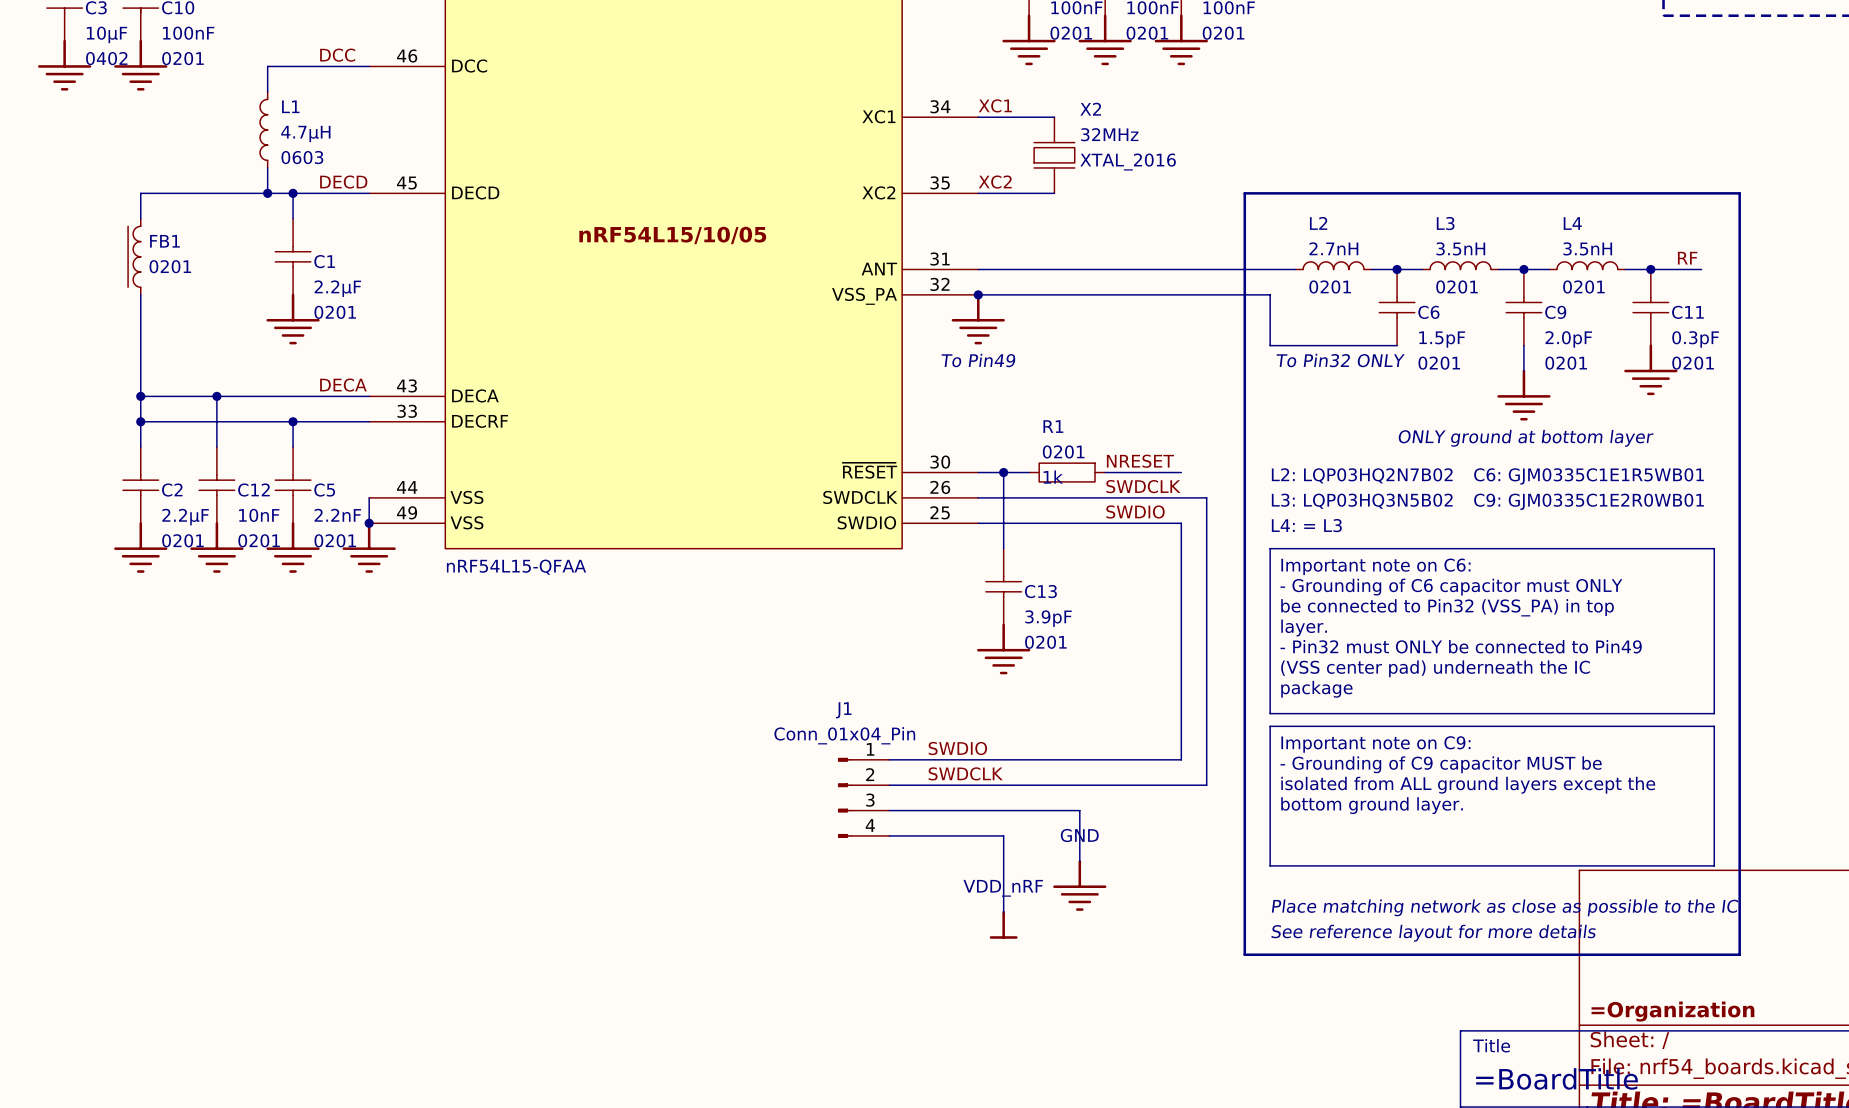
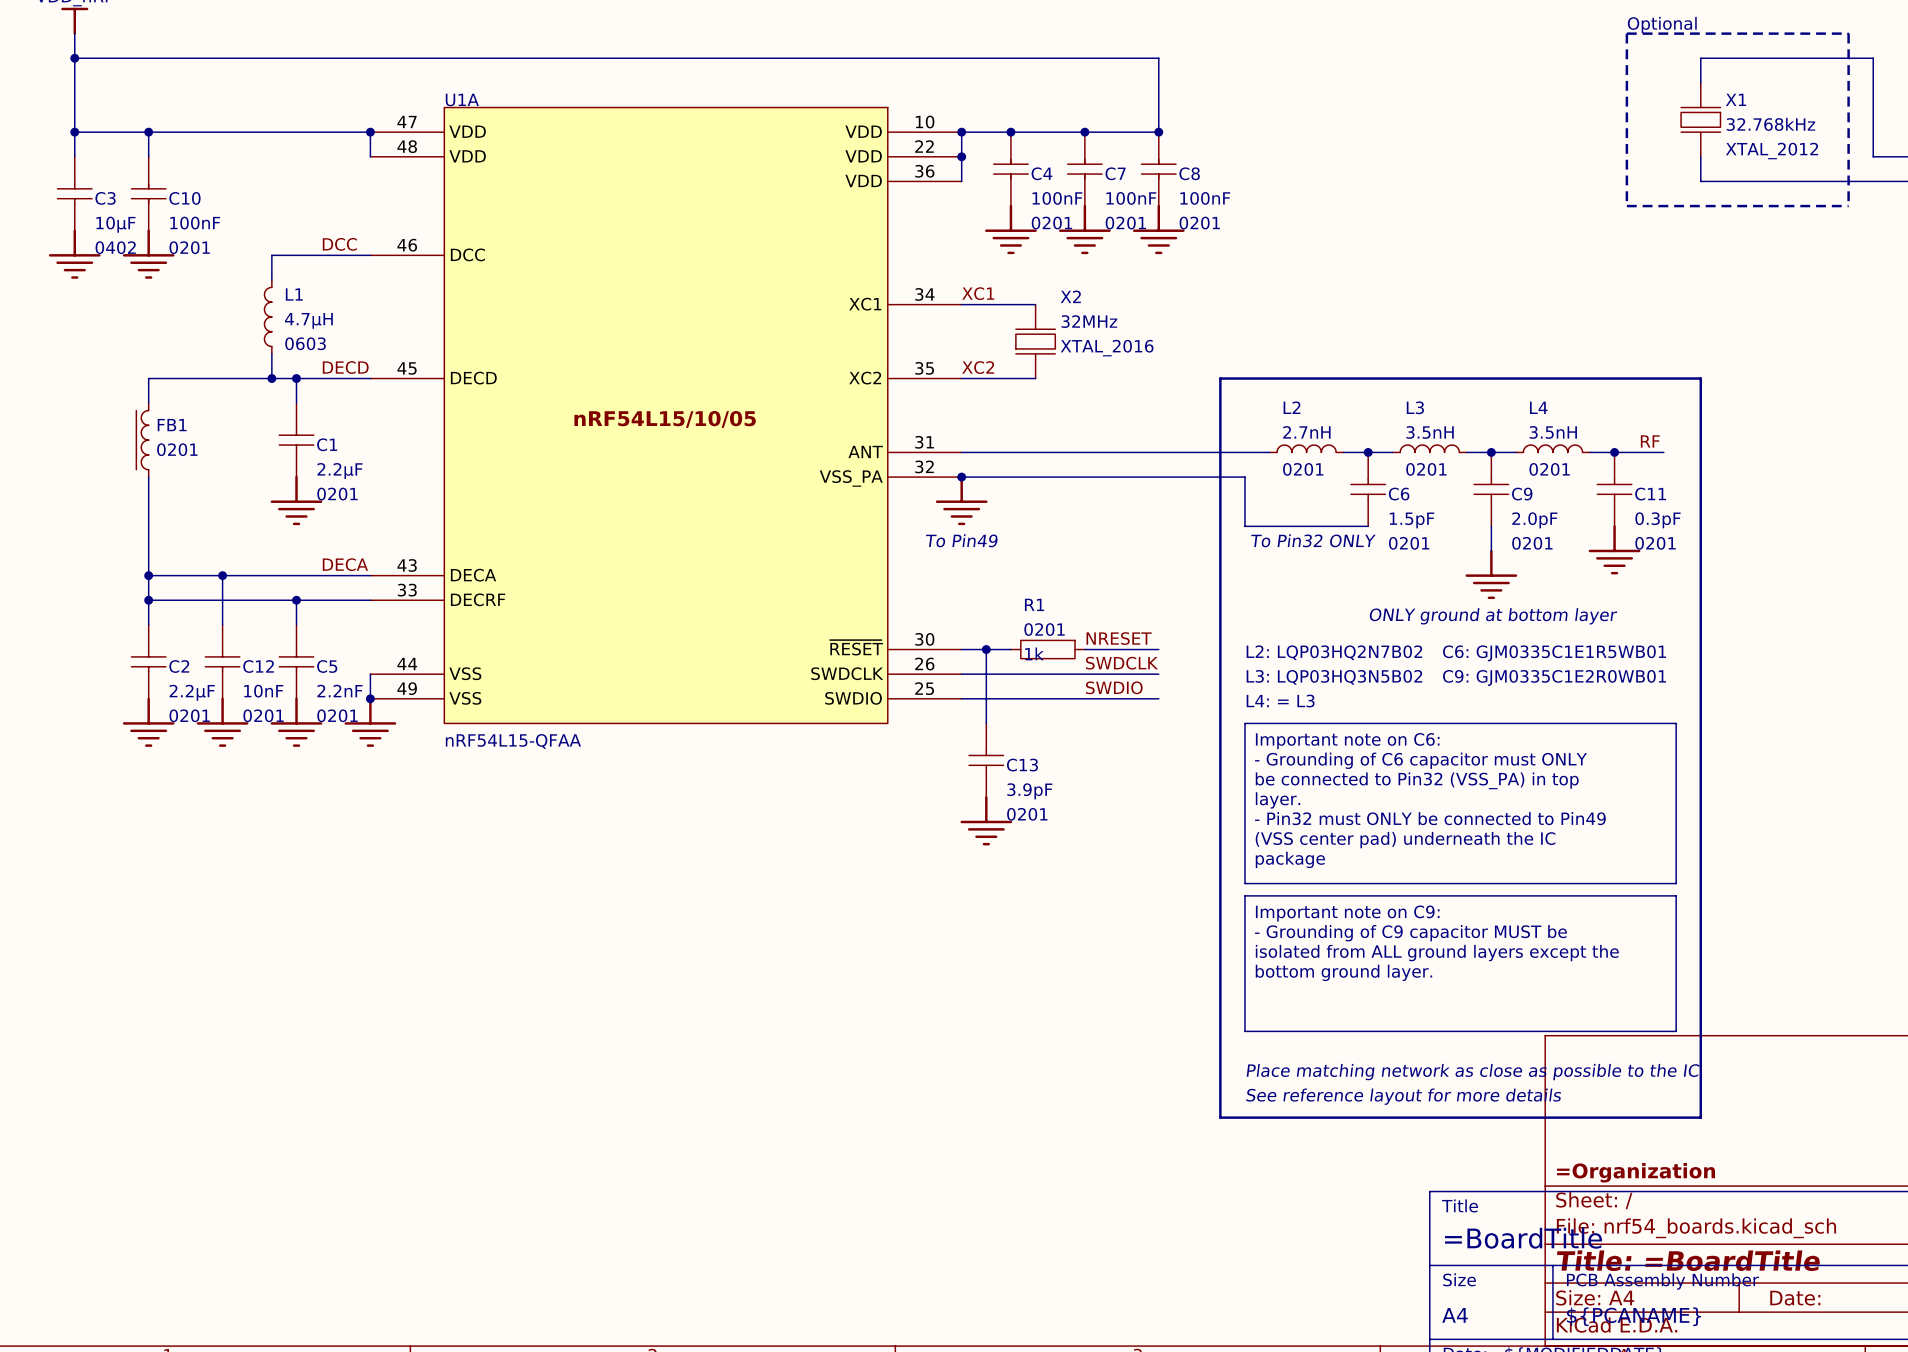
wire: (1181, 497) (1206, 497) (1206, 785) (889, 785) -> none
wire: (1181, 523) (1181, 759) (889, 759) -> none
label: SWDIO (957, 748) -> none
label: SWDCLK (965, 773) -> none
J1: Conn_01x04_Pin (863, 797) -> none
wire: (889, 810) (1079, 810) (1079, 861) -> none
wire: (889, 835) (1003, 835) (1003, 912) -> none
power symbol: GND (1079, 885) -> none
power symbol: VDD_nRF (1003, 924) -> none

